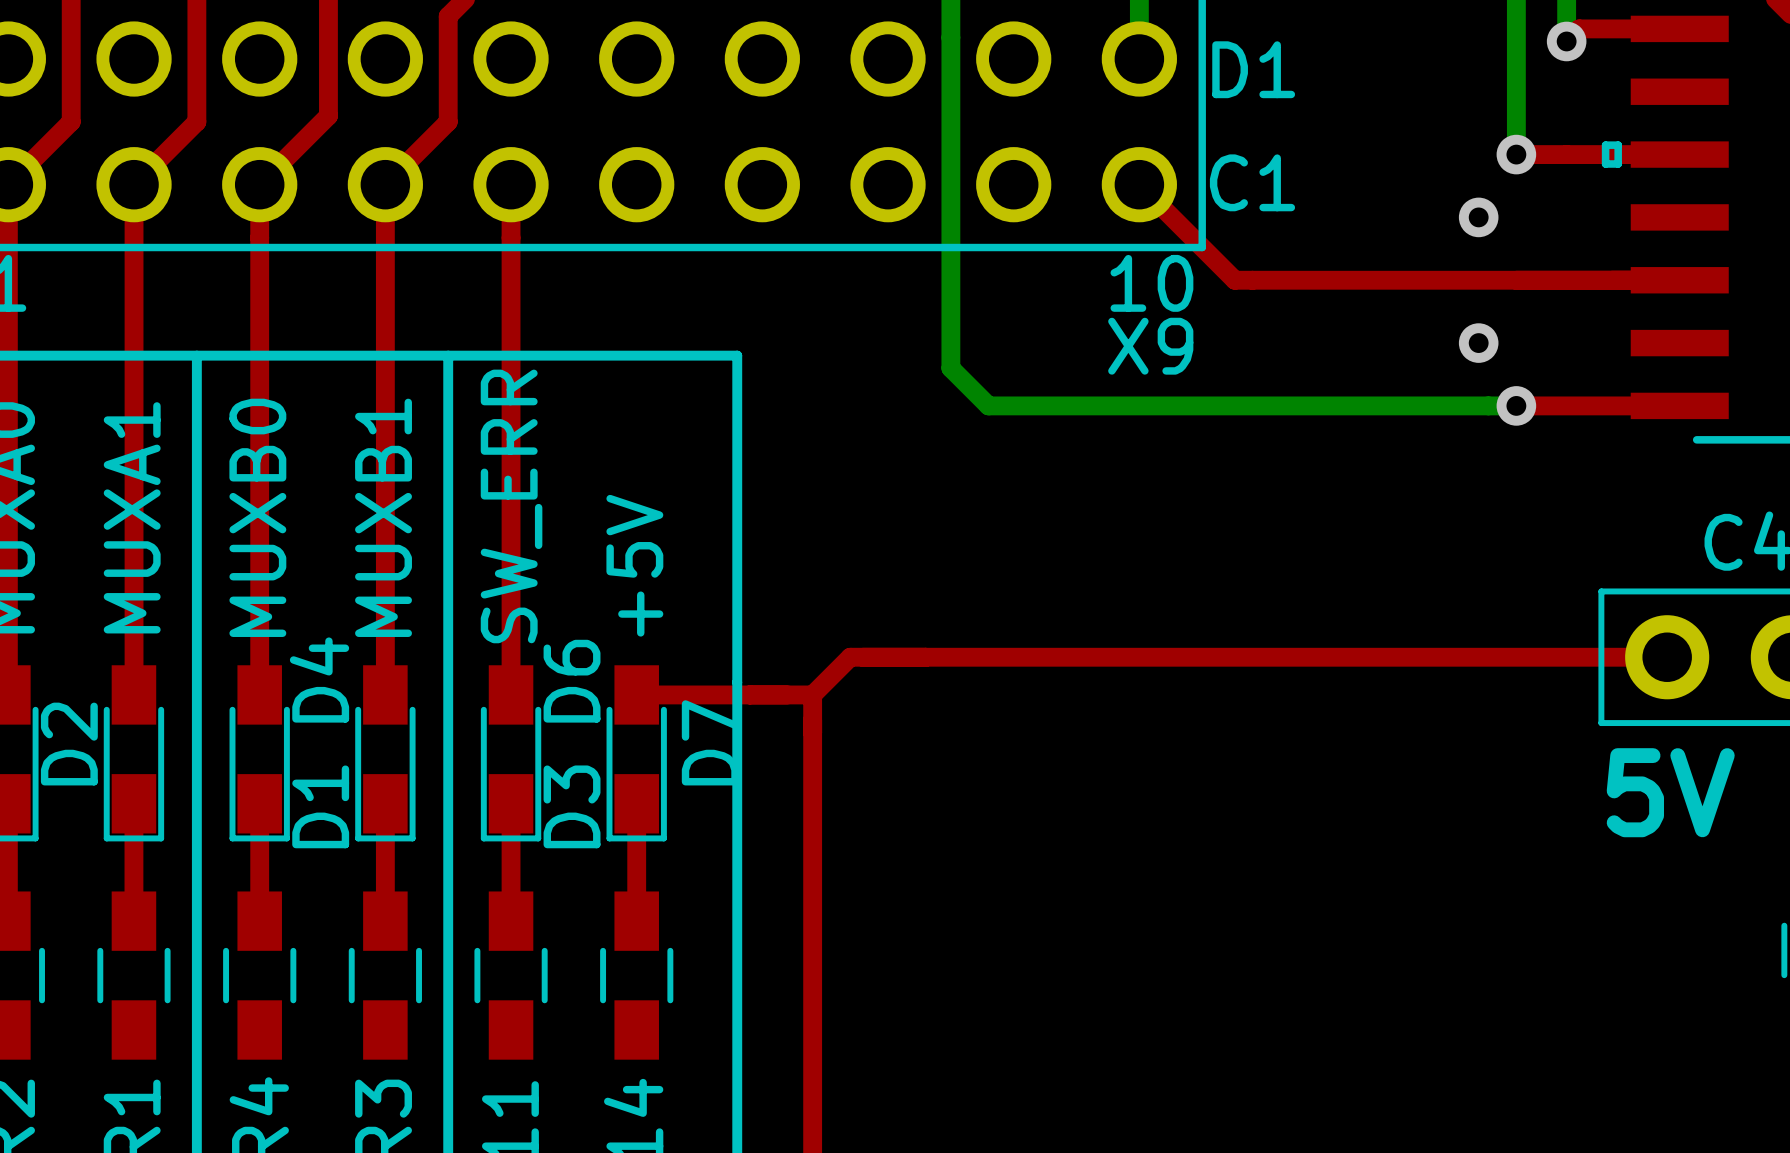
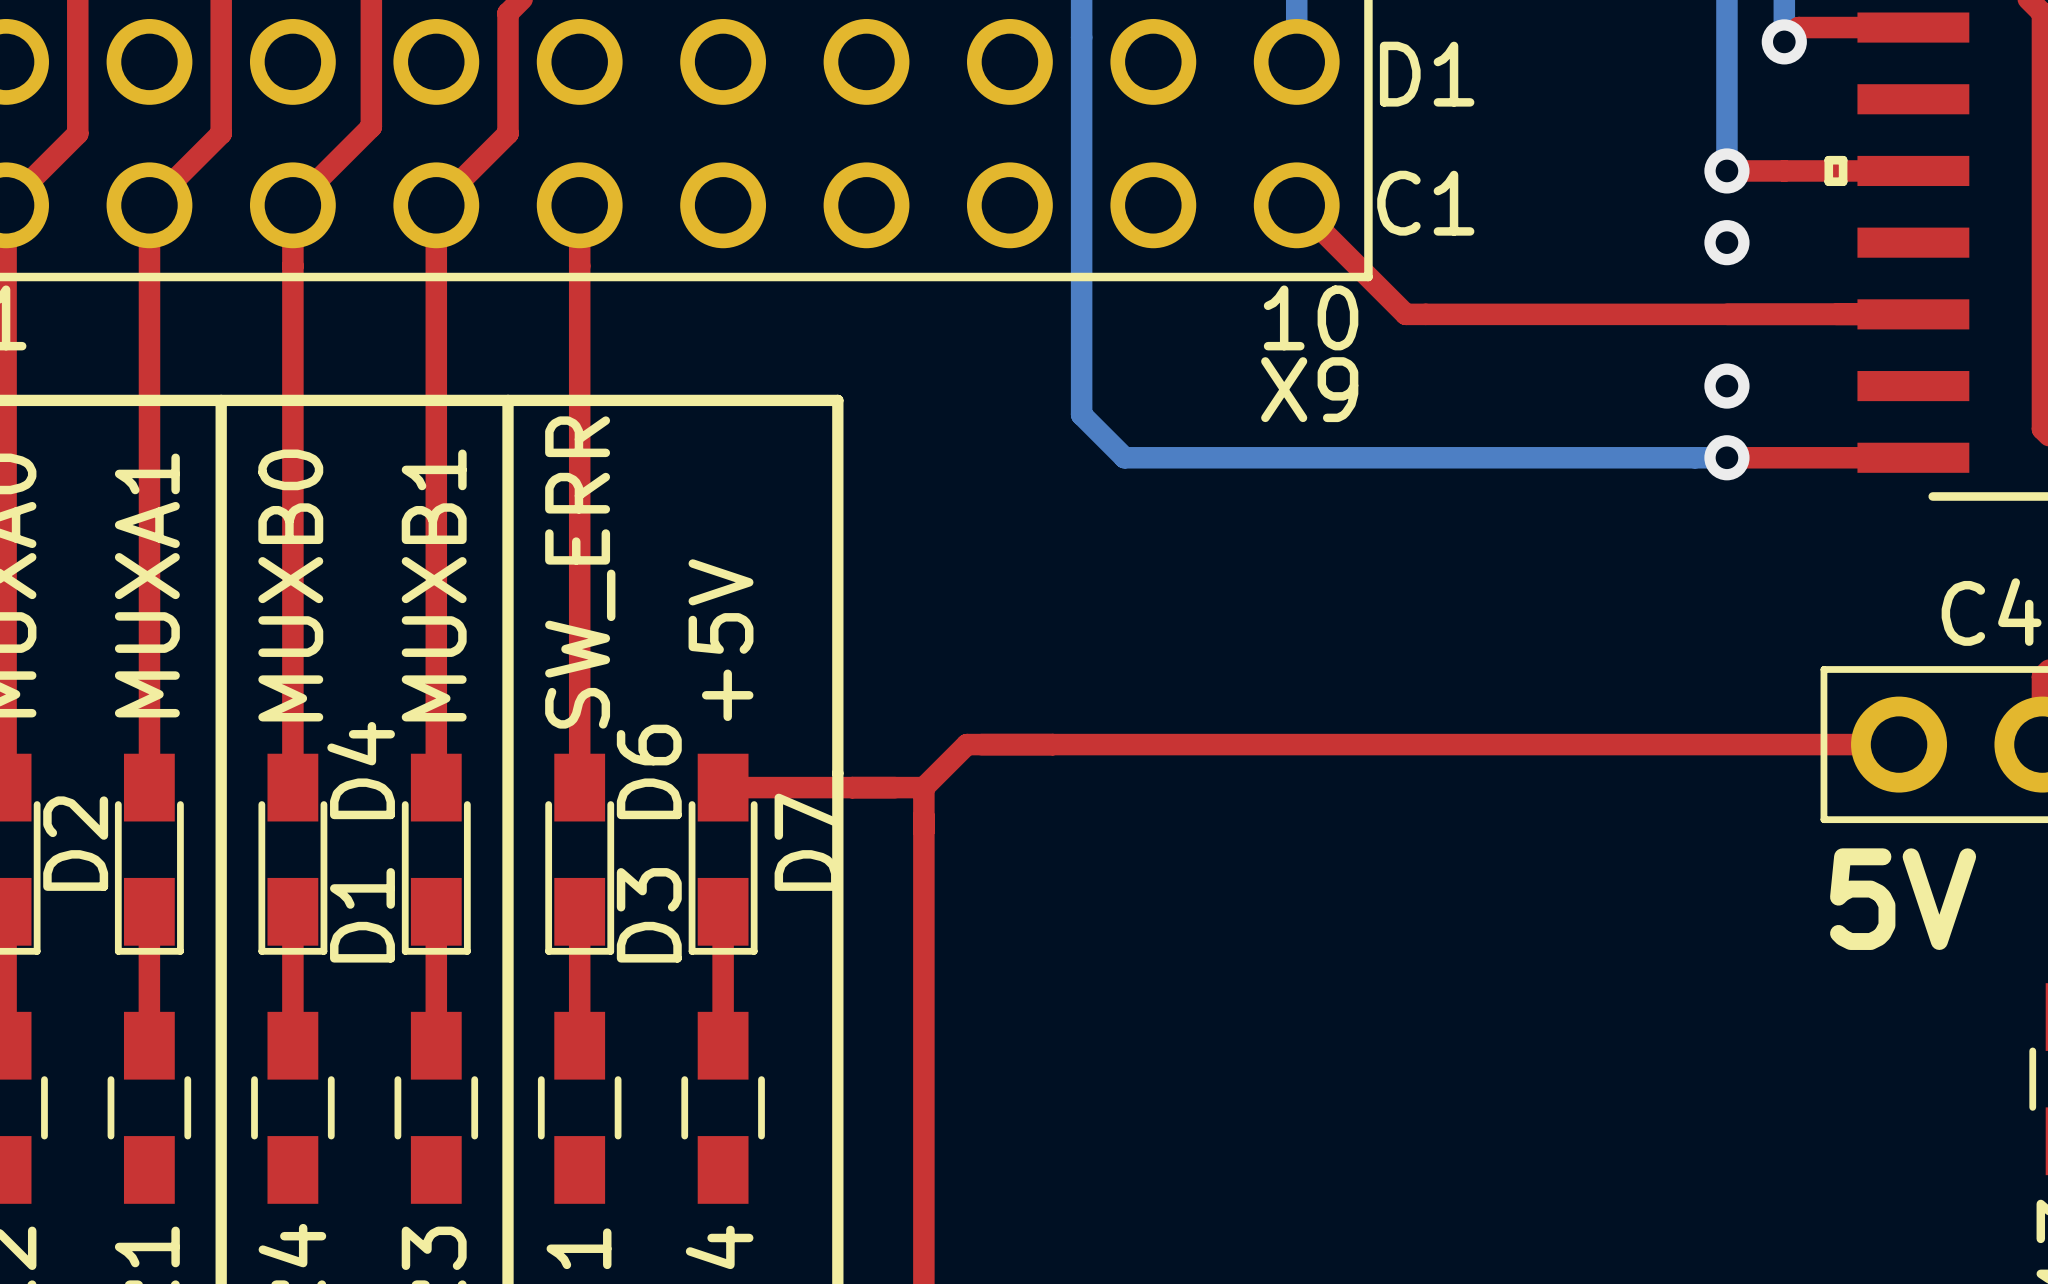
via position: (1478, 217) -> (1726, 242)
via position: (1478, 343) -> (1726, 386)

